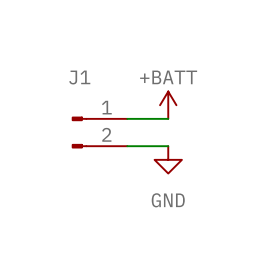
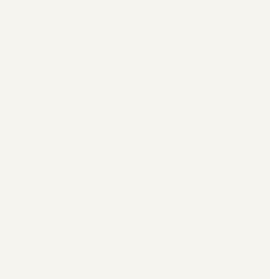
power symbol: +BATT (168, 105) -> none
wire: (127, 118) (168, 118) -> none
J1: (99, 132) -> none
wire: (127, 146) (168, 146) -> none
power symbol: GND (168, 159) -> none

